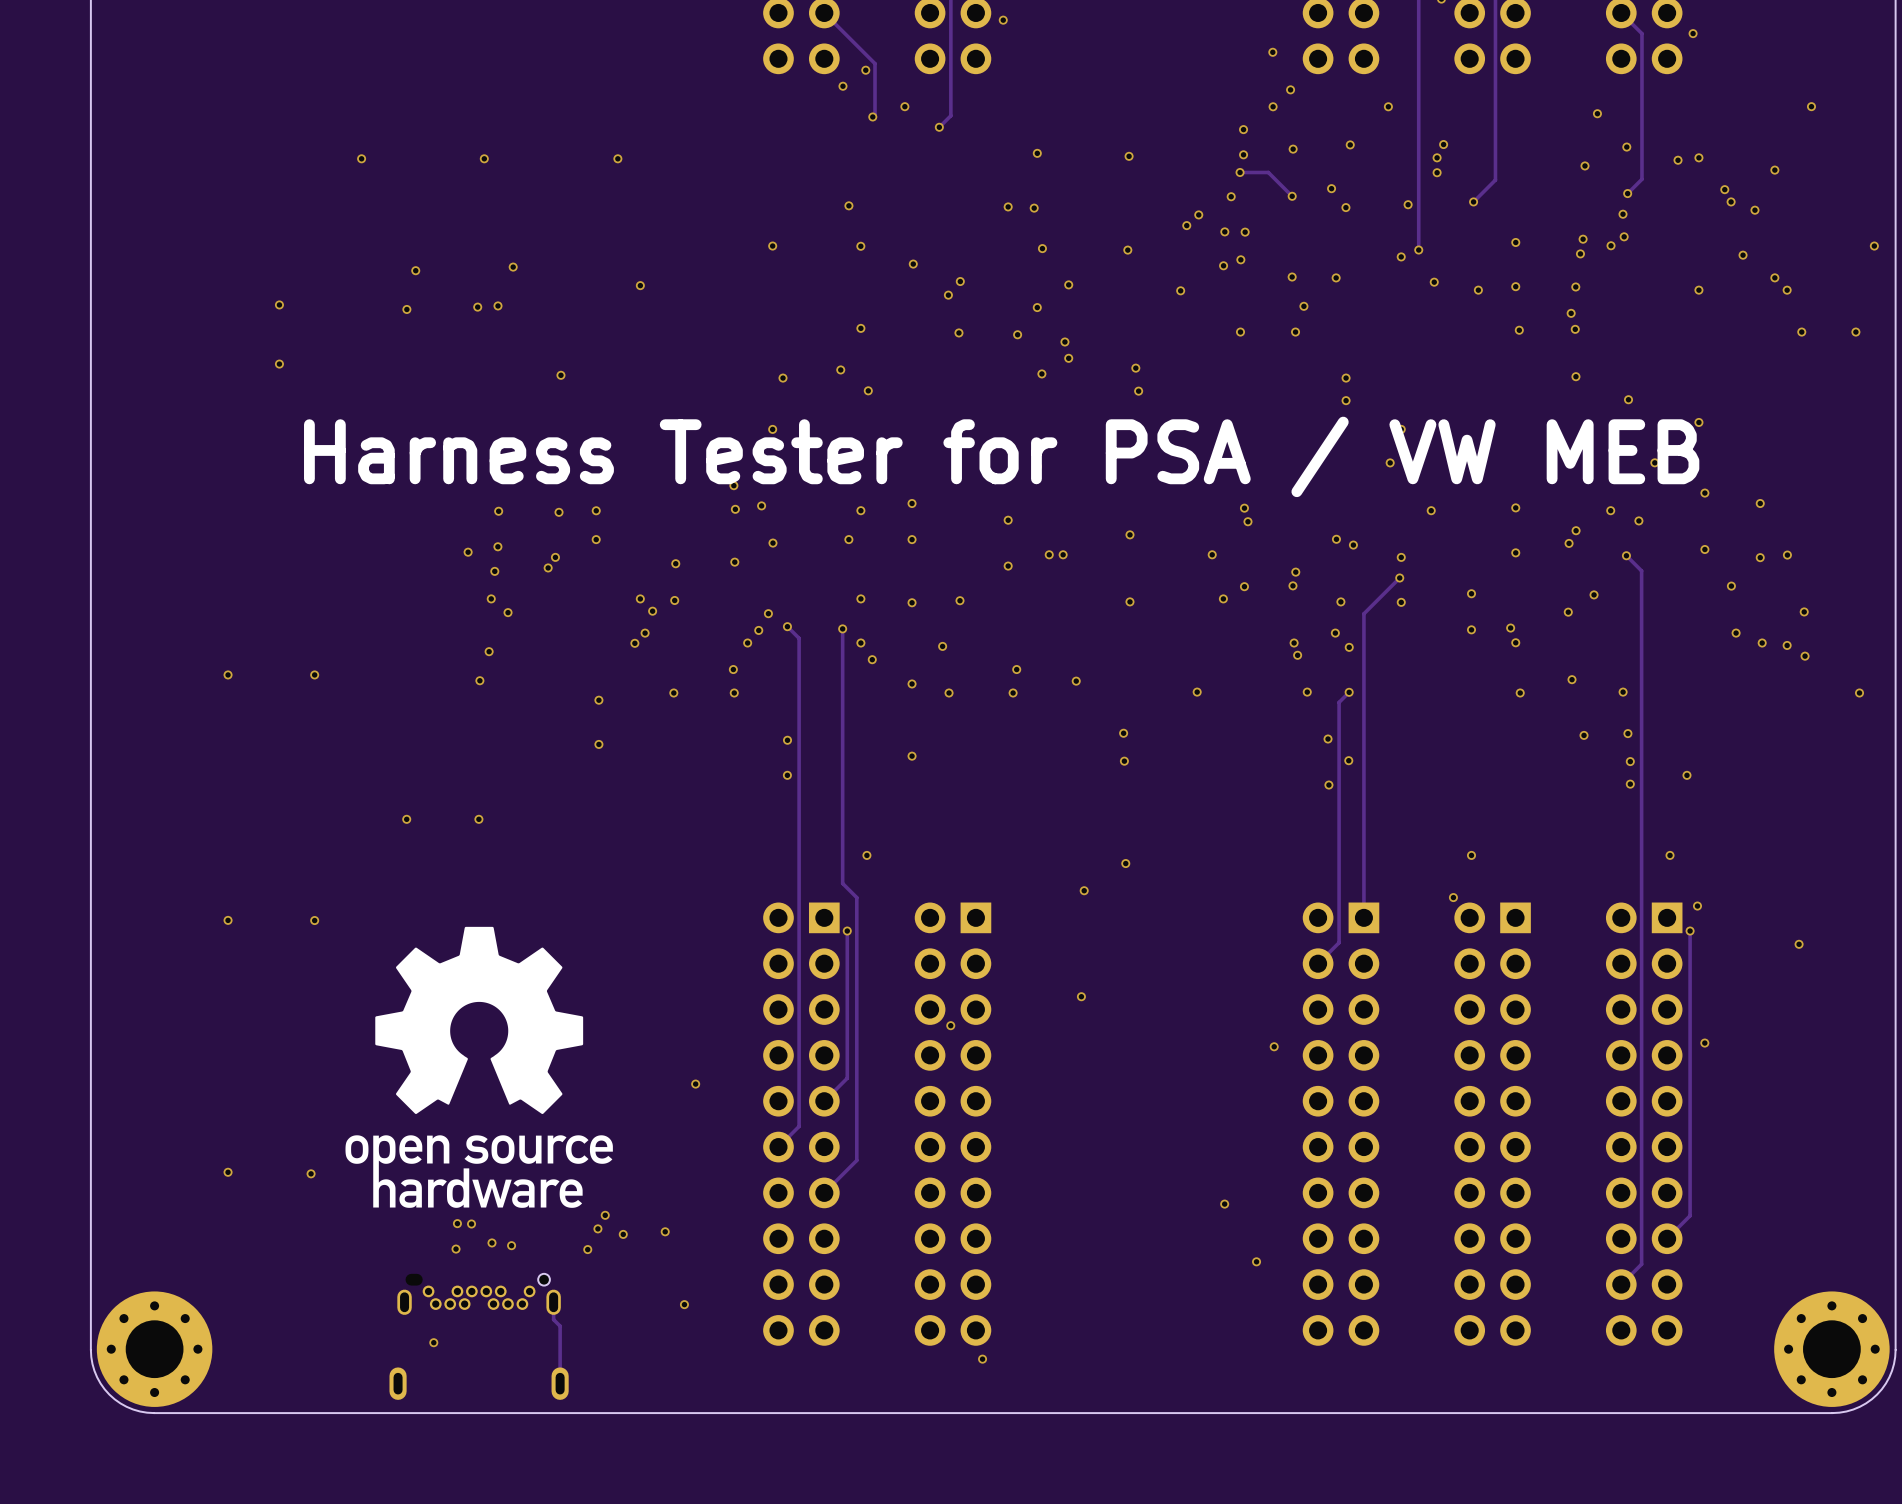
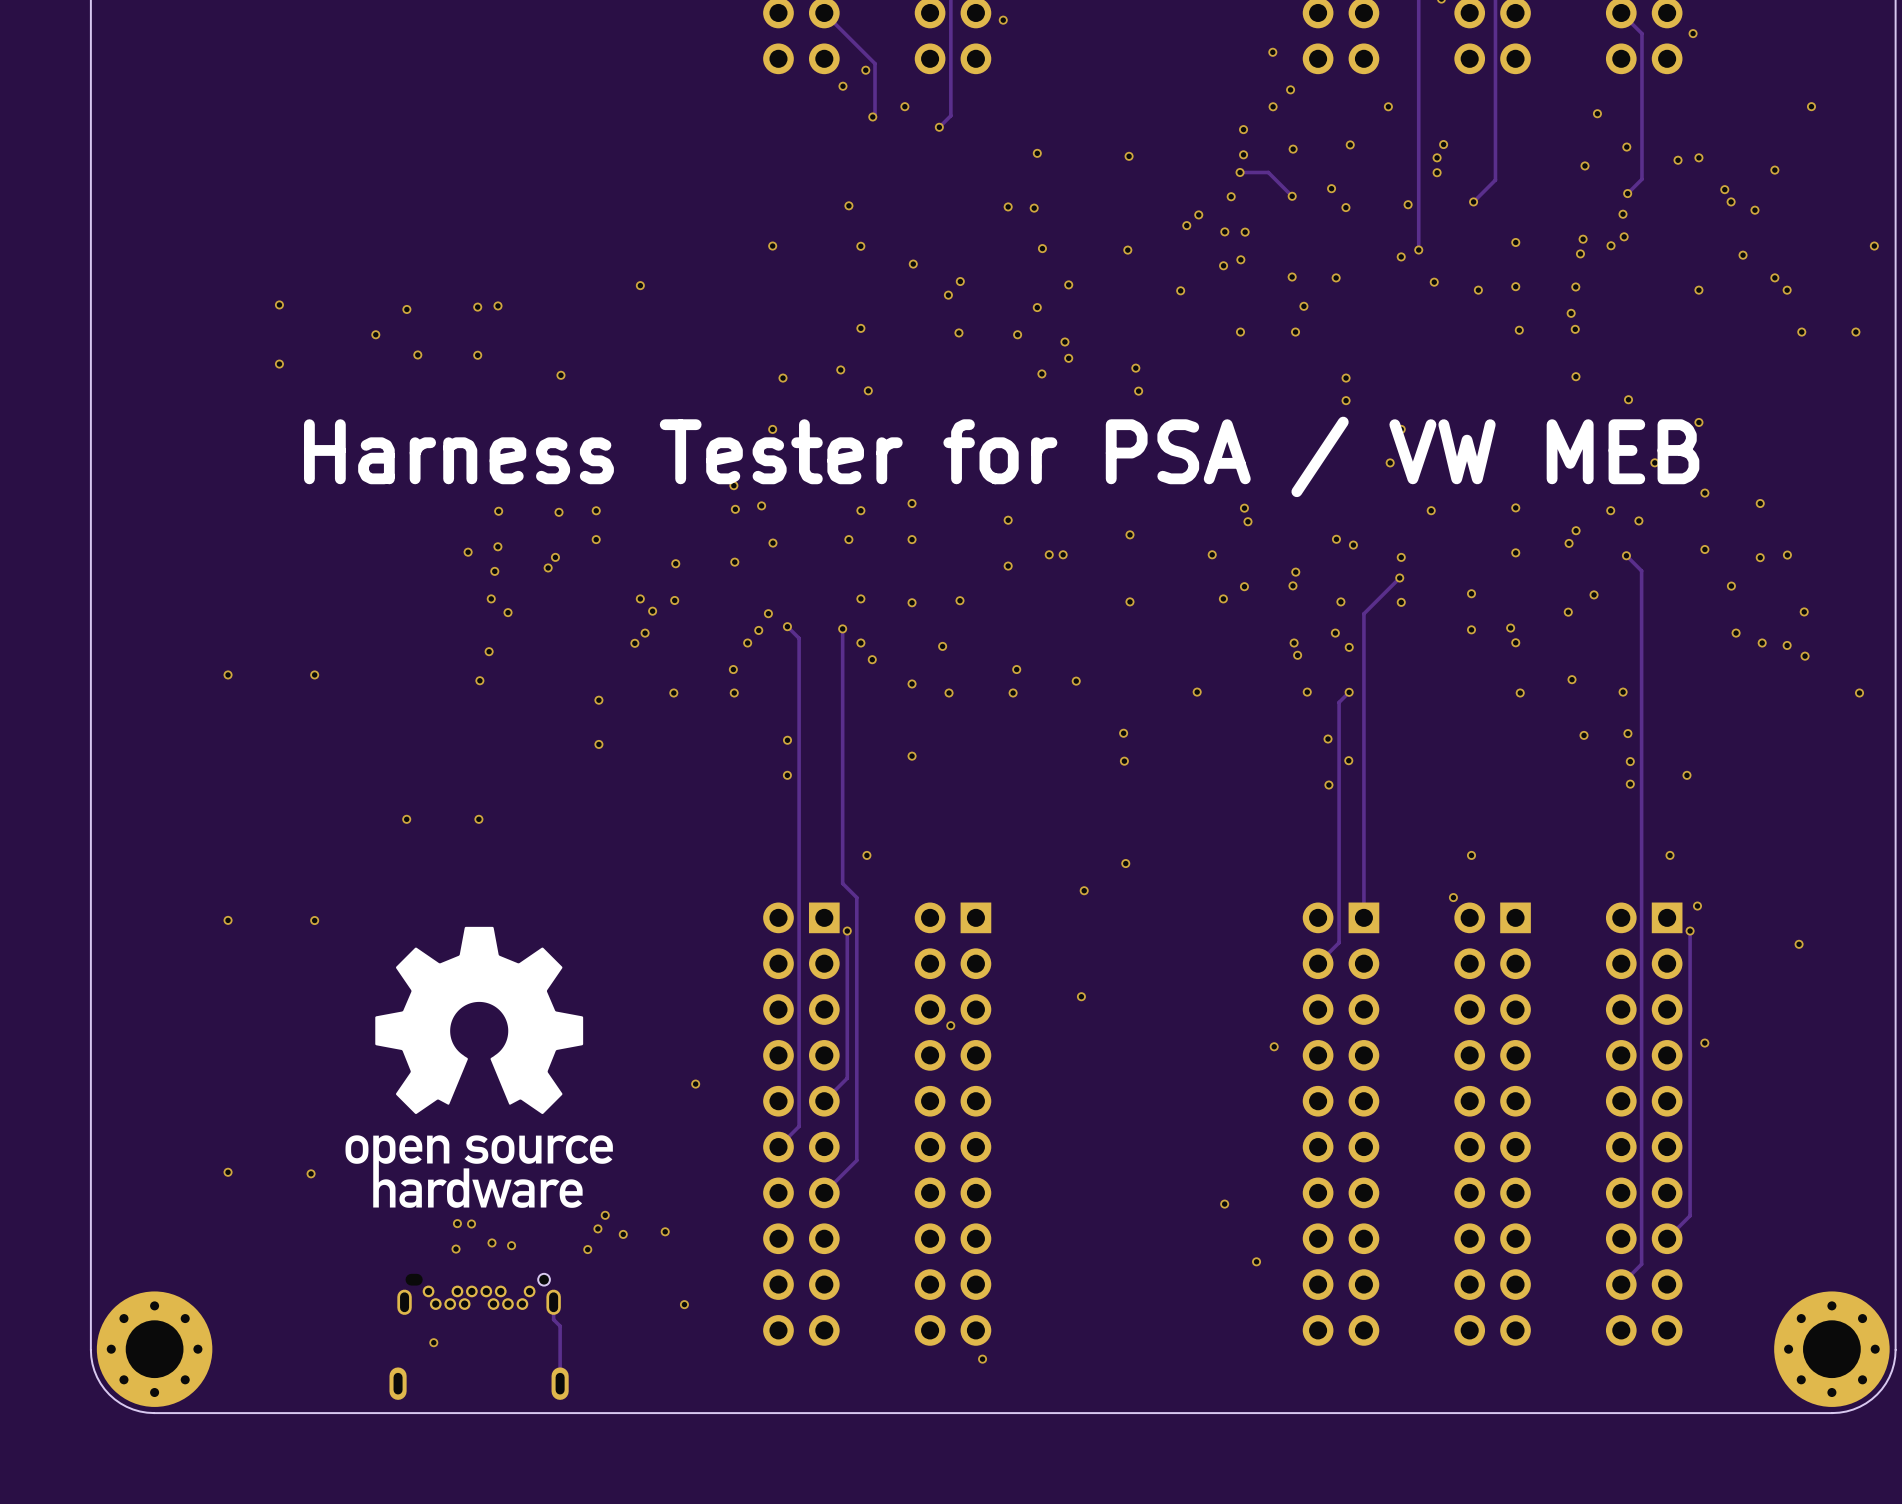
via: (361, 158) -> none
via: (484, 158) -> none
via: (617, 158) -> none
via: (513, 267) -> none
via: (415, 270) -> none
via: none -> (375, 334)
via: none -> (417, 354)
via: none -> (477, 355)

